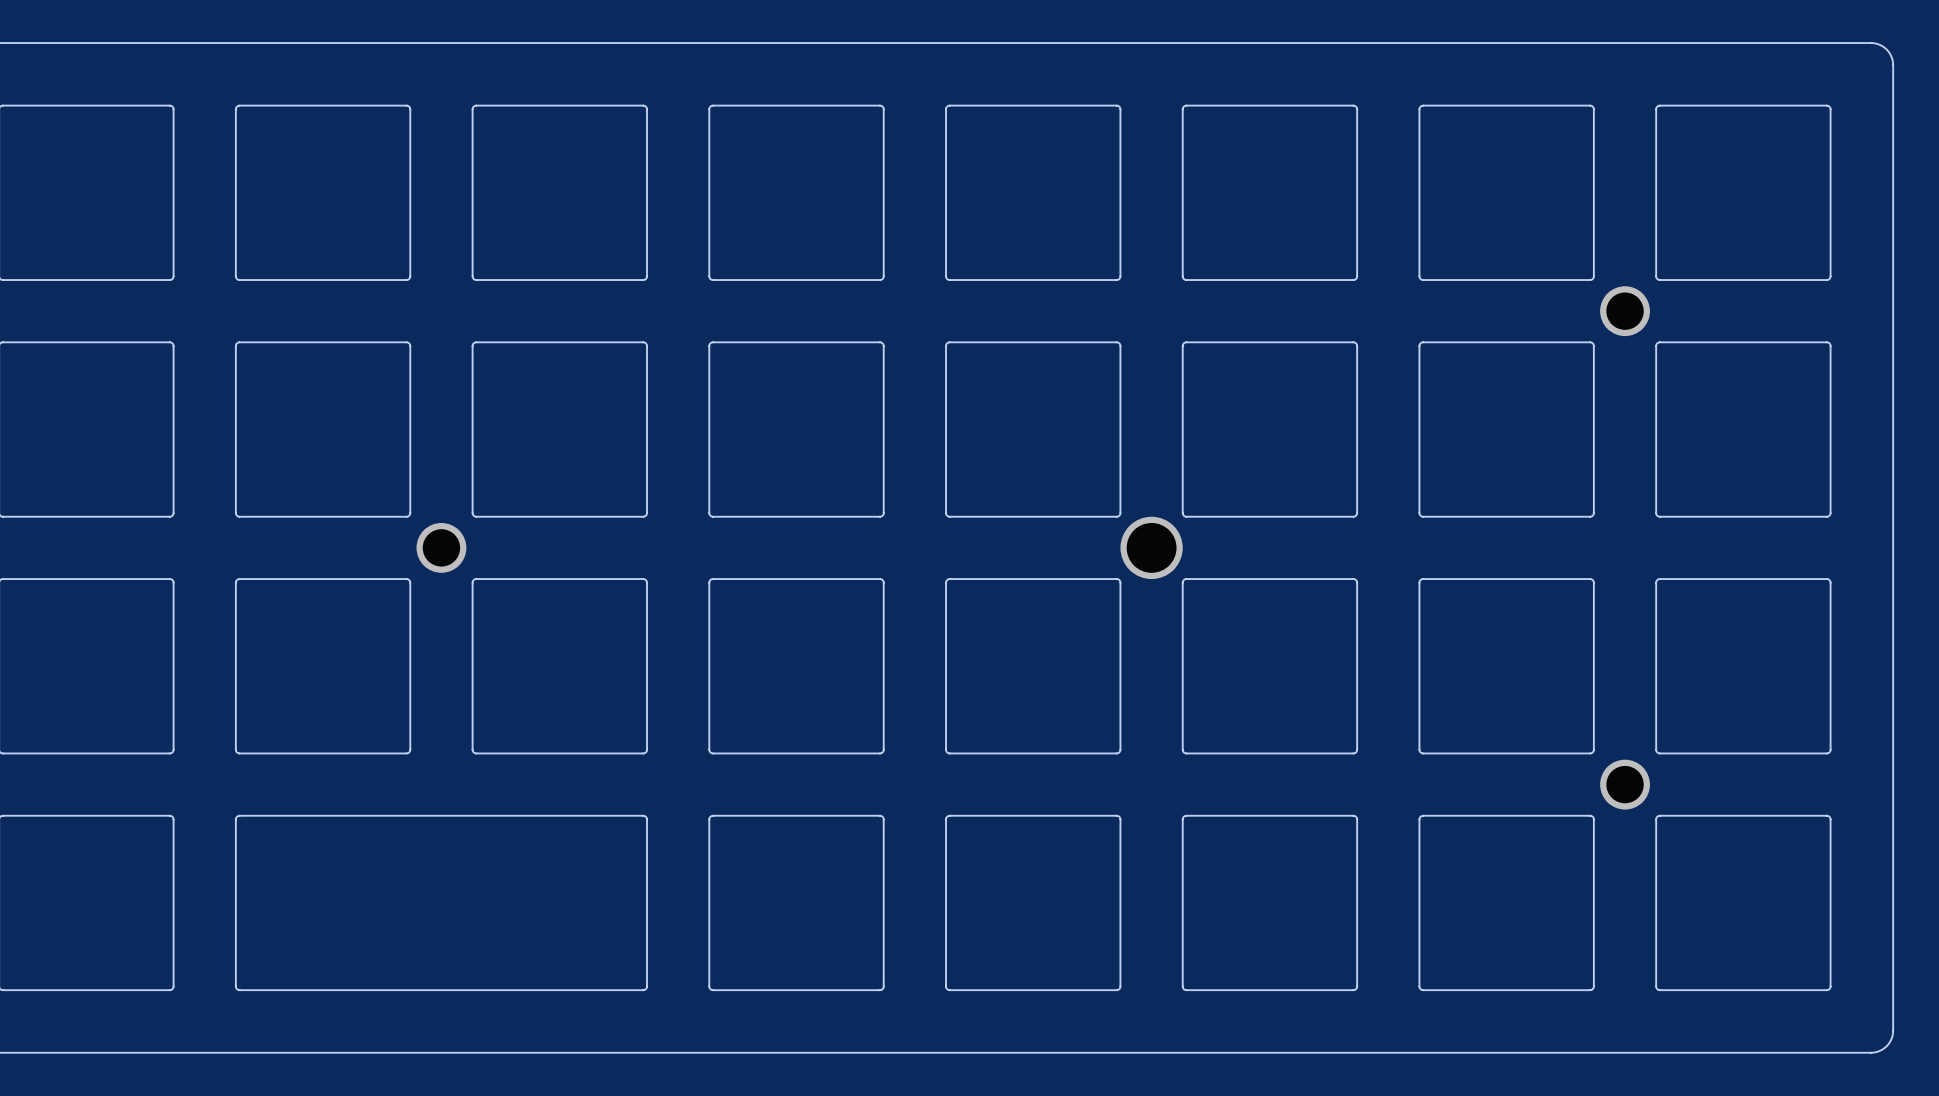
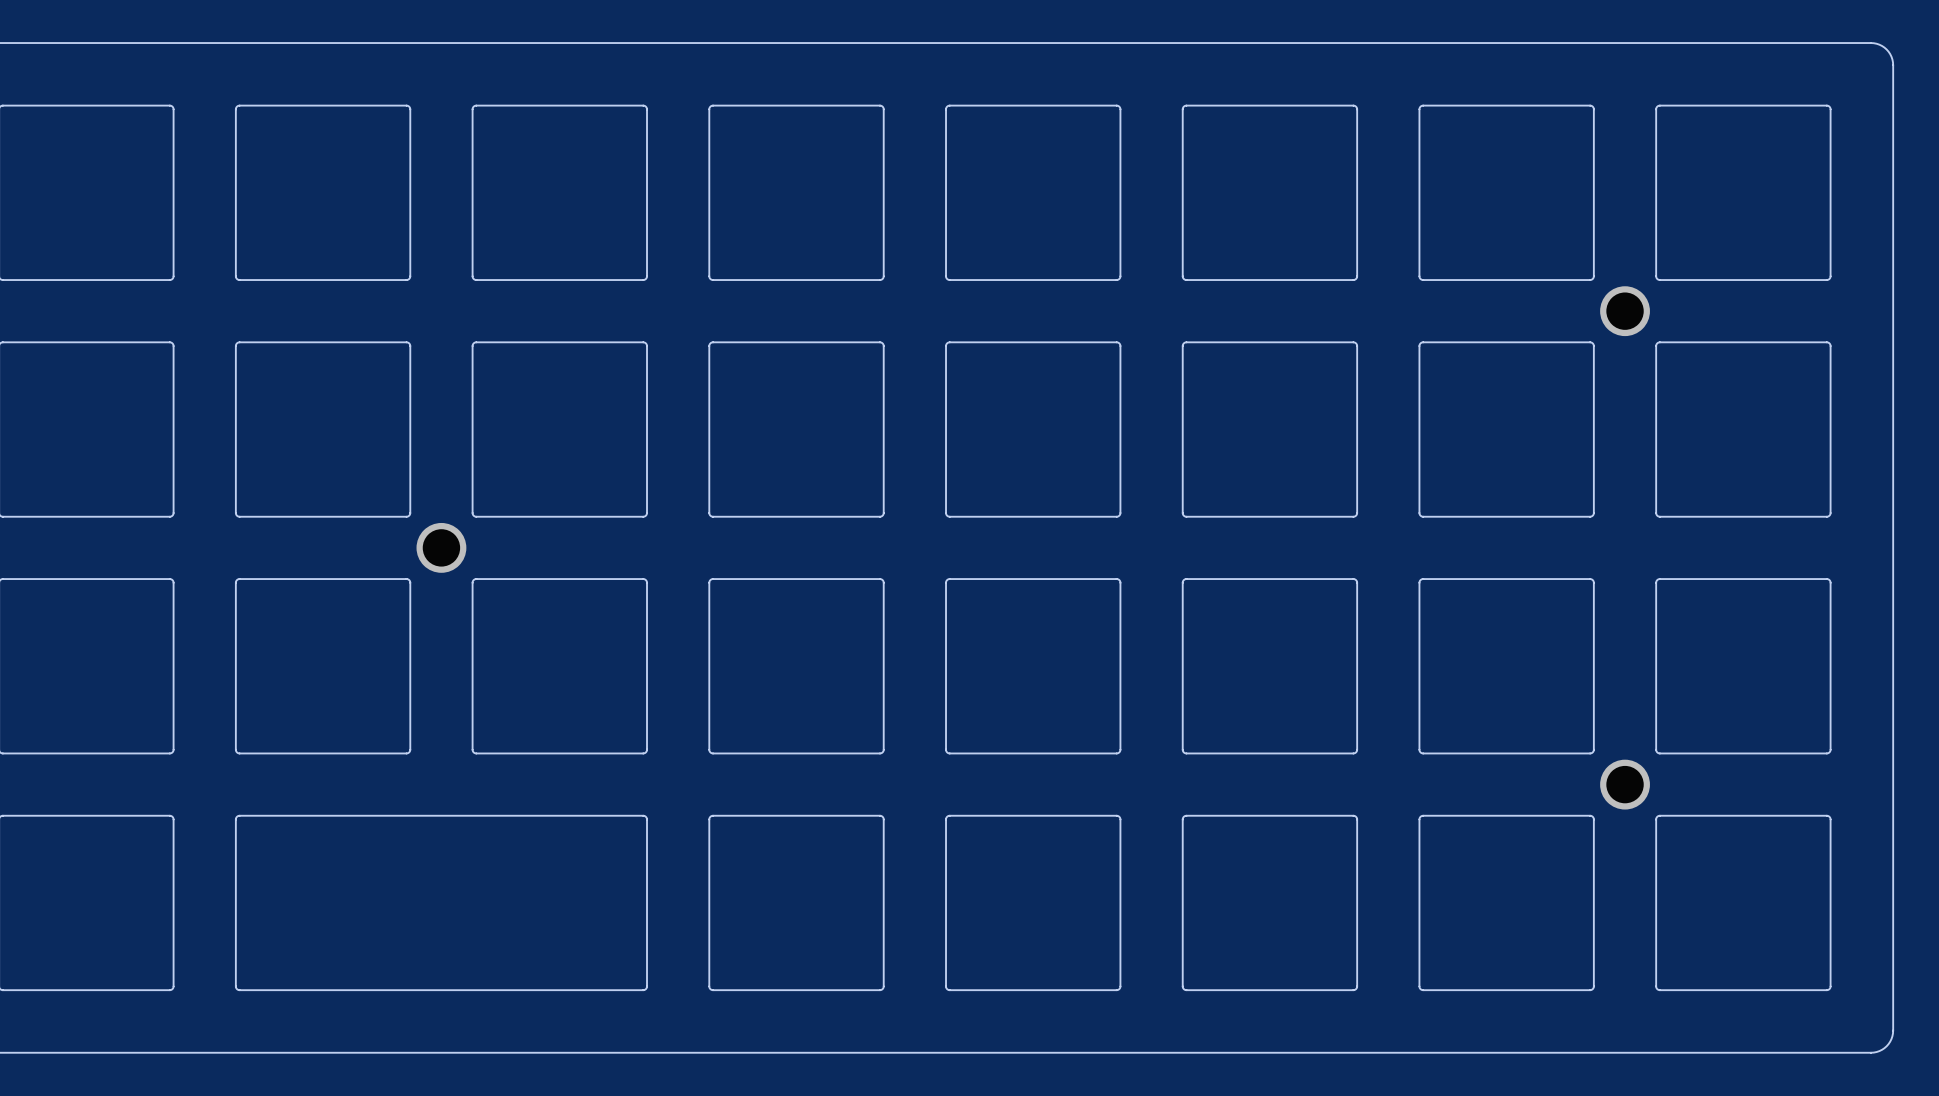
via: (1151, 547) -> none

